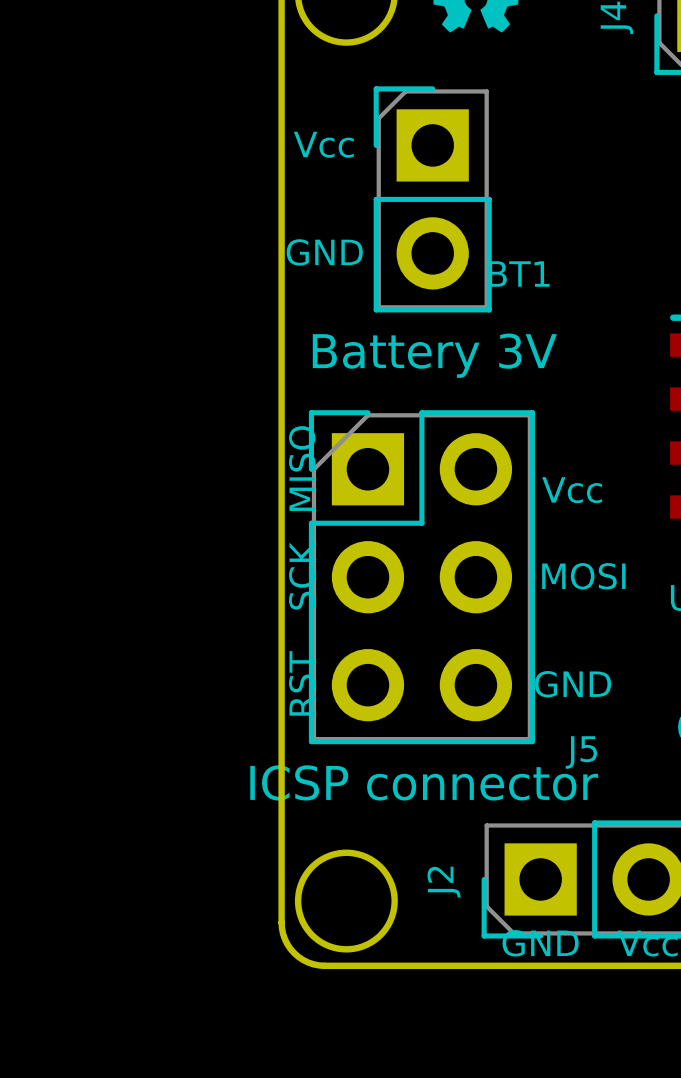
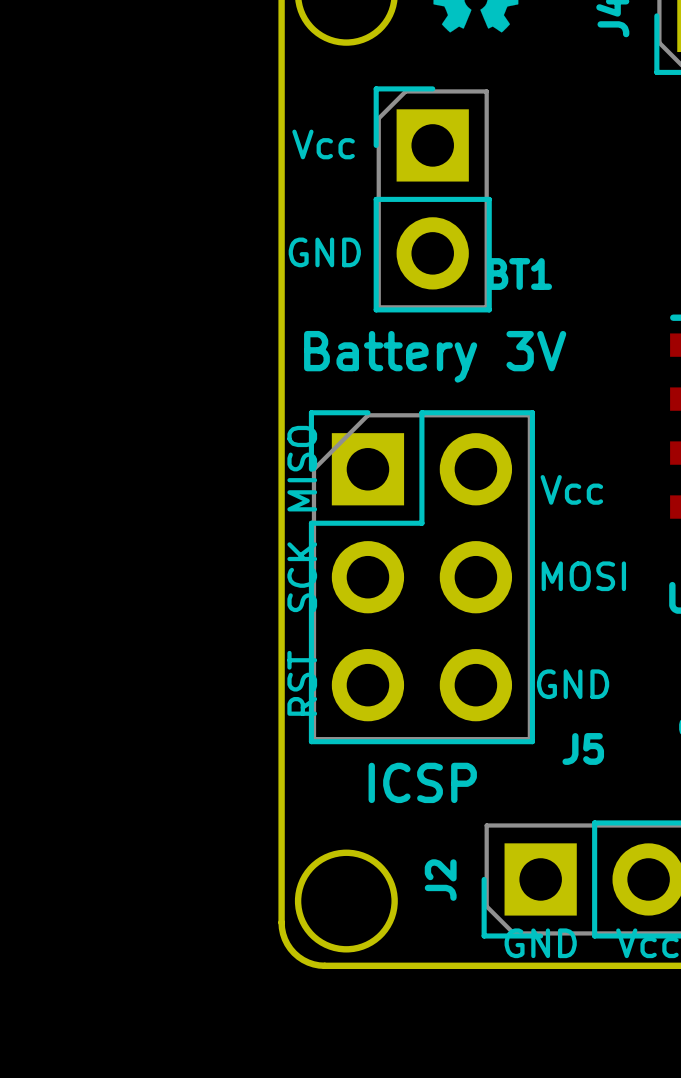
J5 value: ICSP connector (424, 782) -> ICSP (422, 782)

